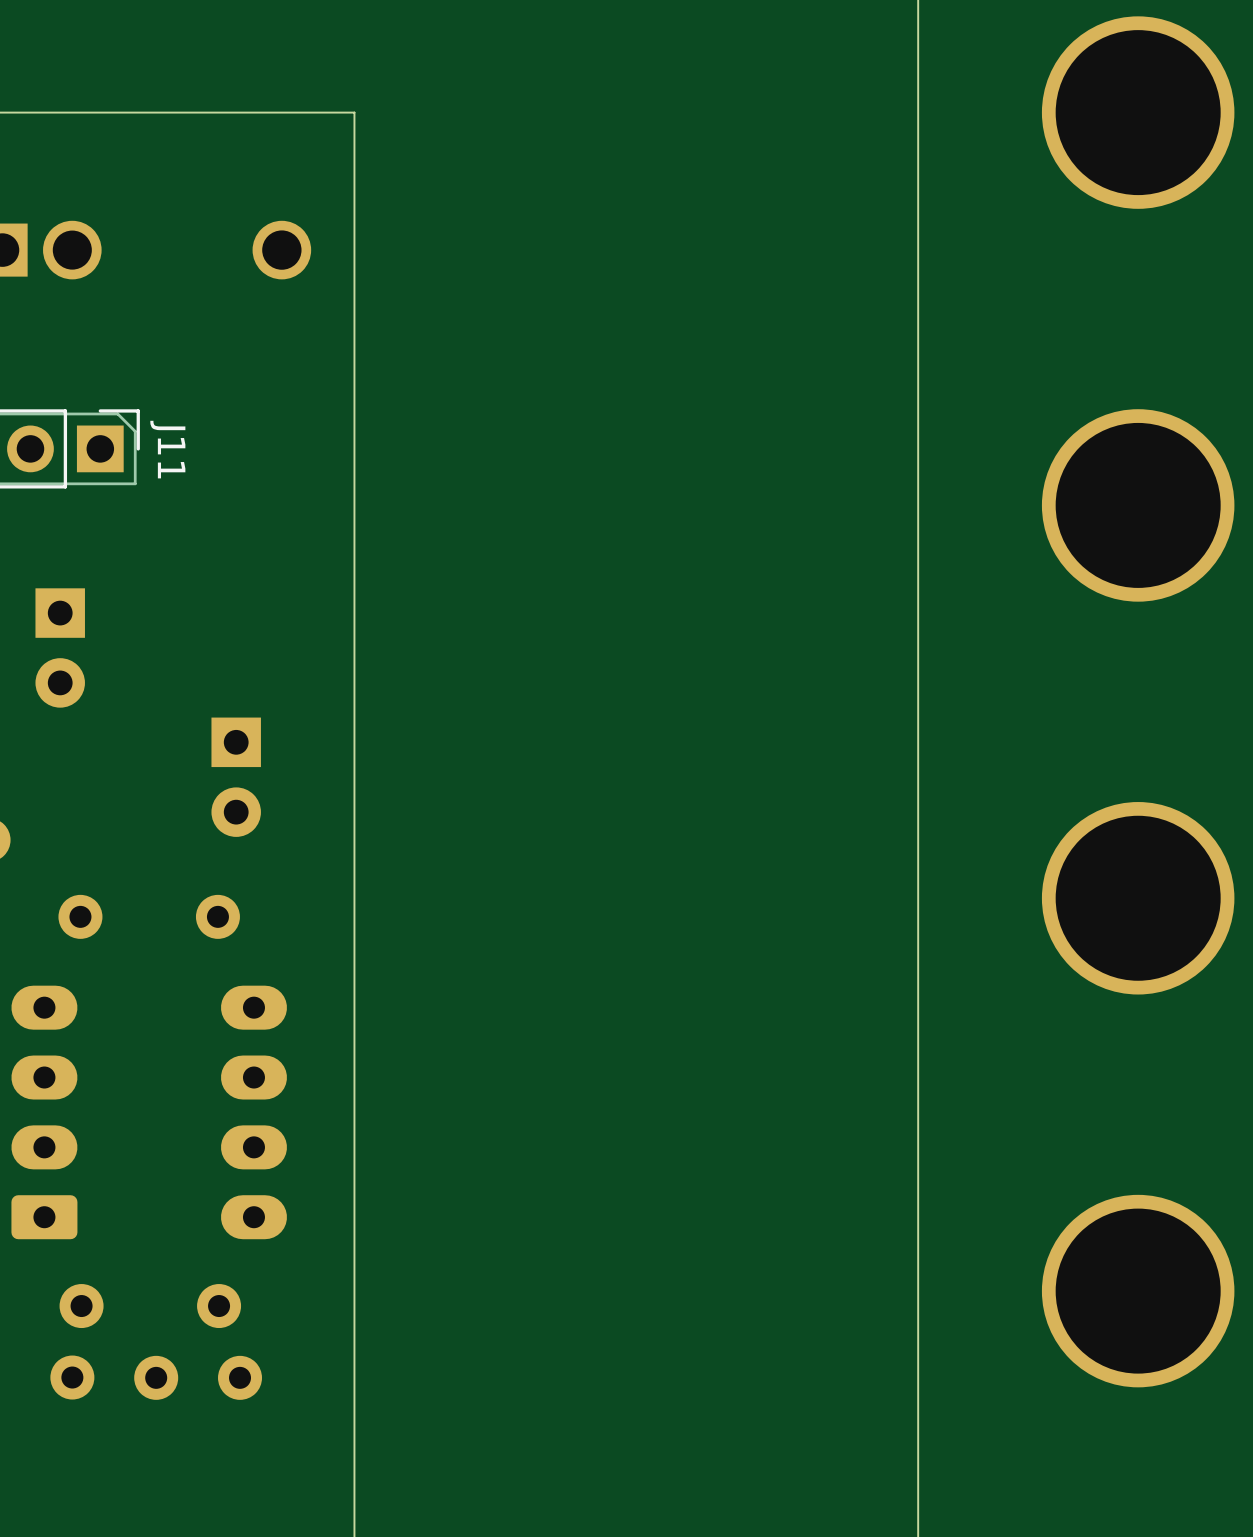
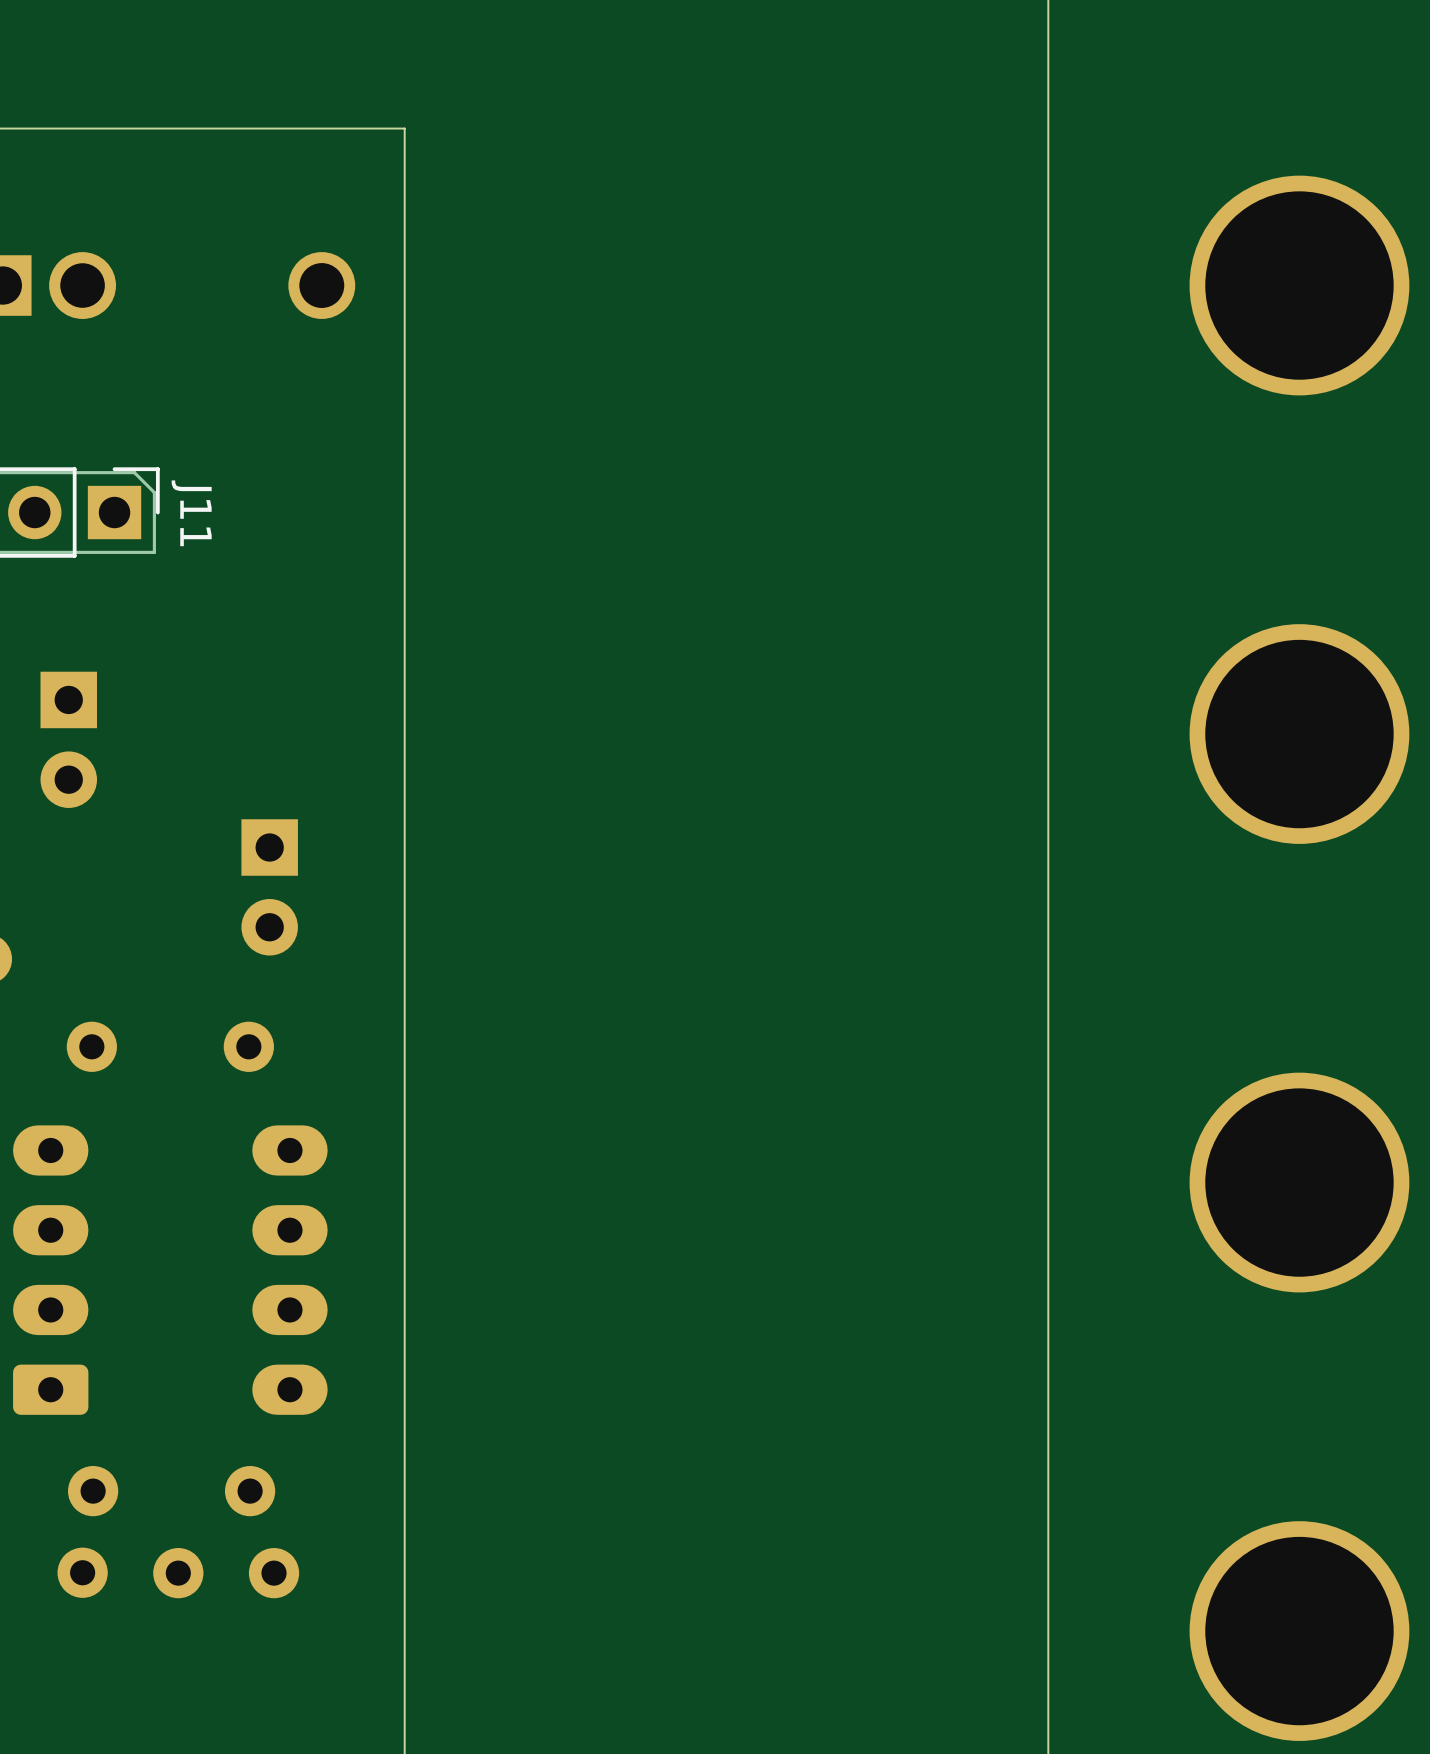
part: (1138, 112) -> none
part: none -> (1299, 285)
part: (1138, 505) -> none
part: none -> (1299, 734)
part: (1138, 898) -> none
part: none -> (1299, 1182)
part: (1138, 1291) -> none
part: none -> (1299, 1631)

